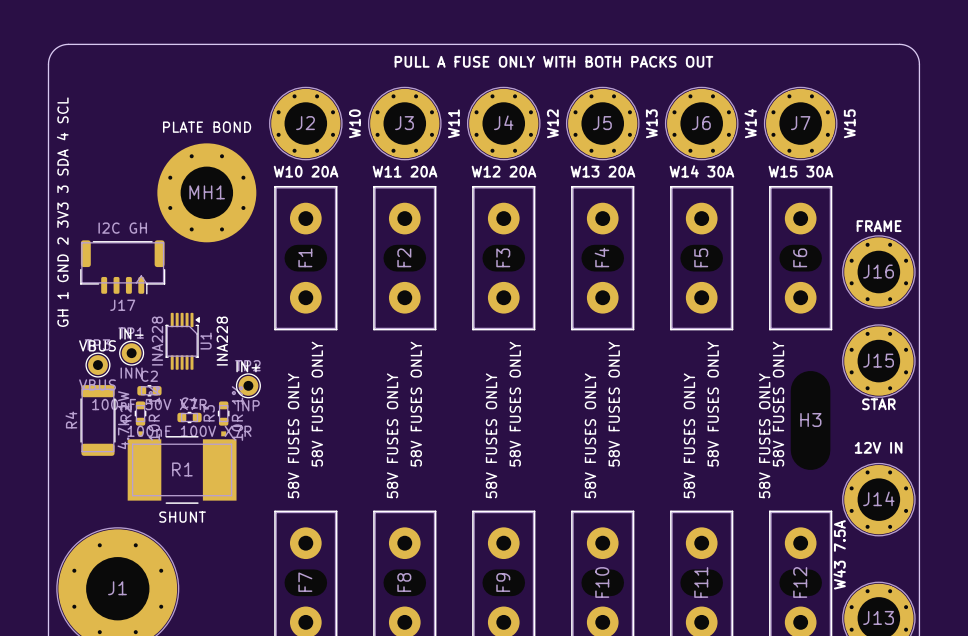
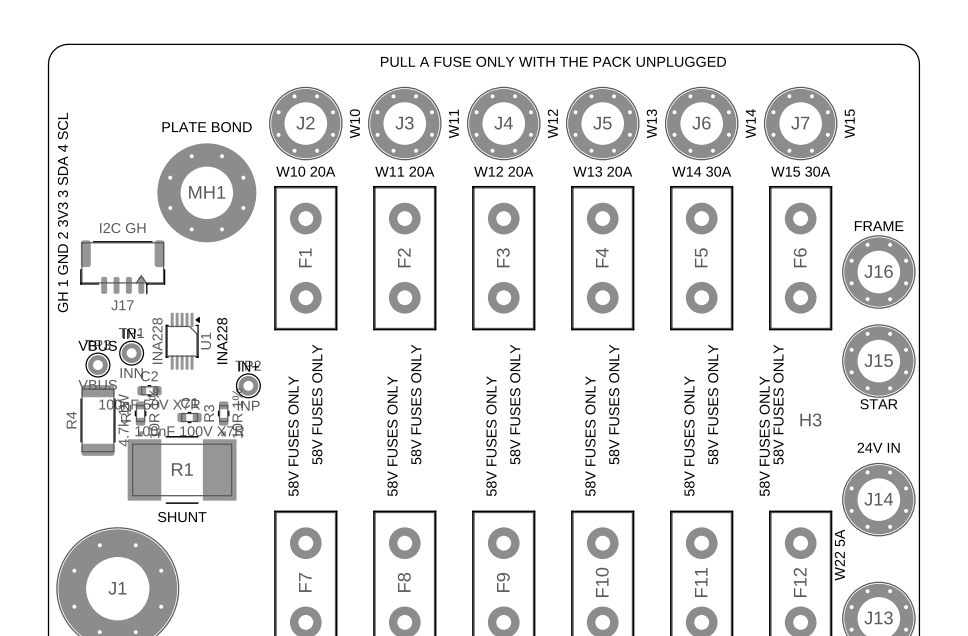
text: PULL A FUSE ONLY WITH BOTH PACKS OUT (553, 61) -> PULL A FUSE ONLY WITH THE PACK UNPLUGGED (553, 61)
text: 12V IN (878, 447) -> 24V IN (878, 447)
text: W43 7.5A (839, 554) -> W22 5A (839, 555)

